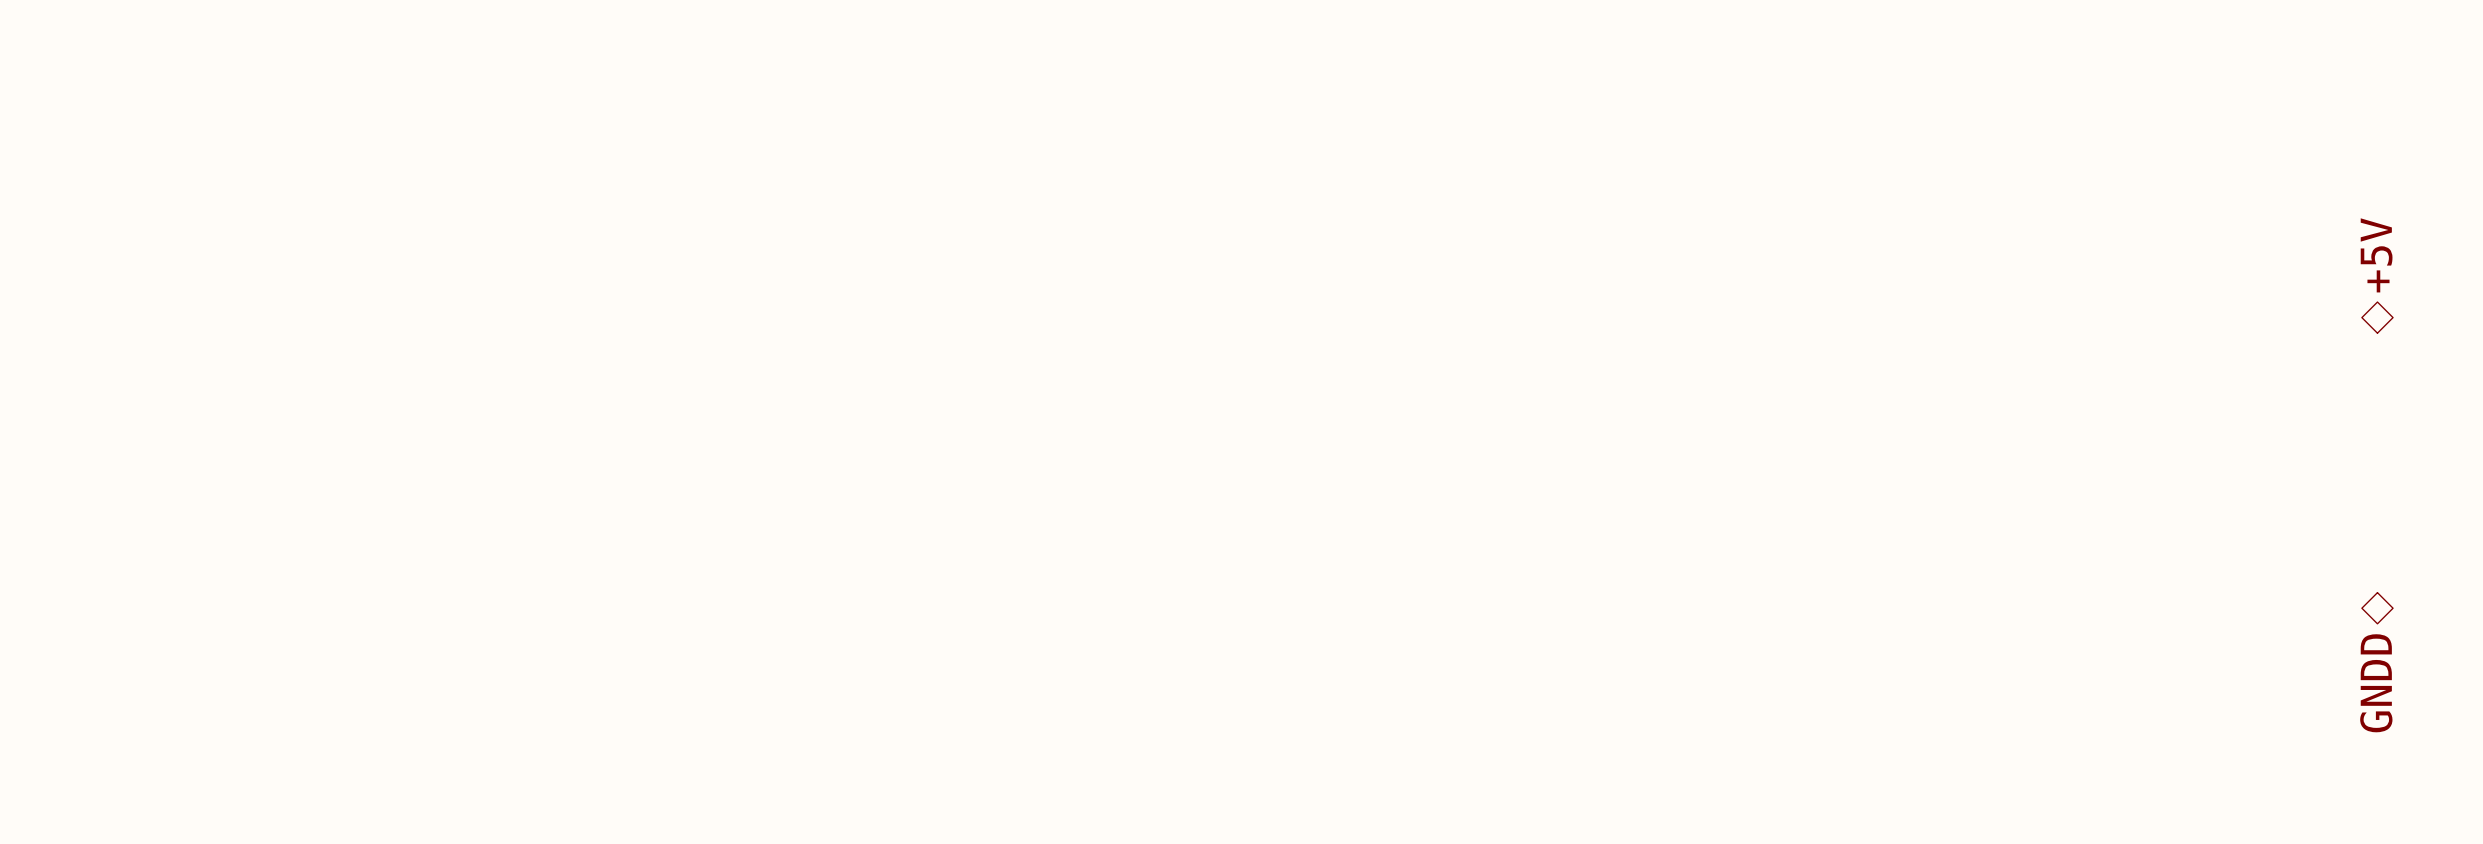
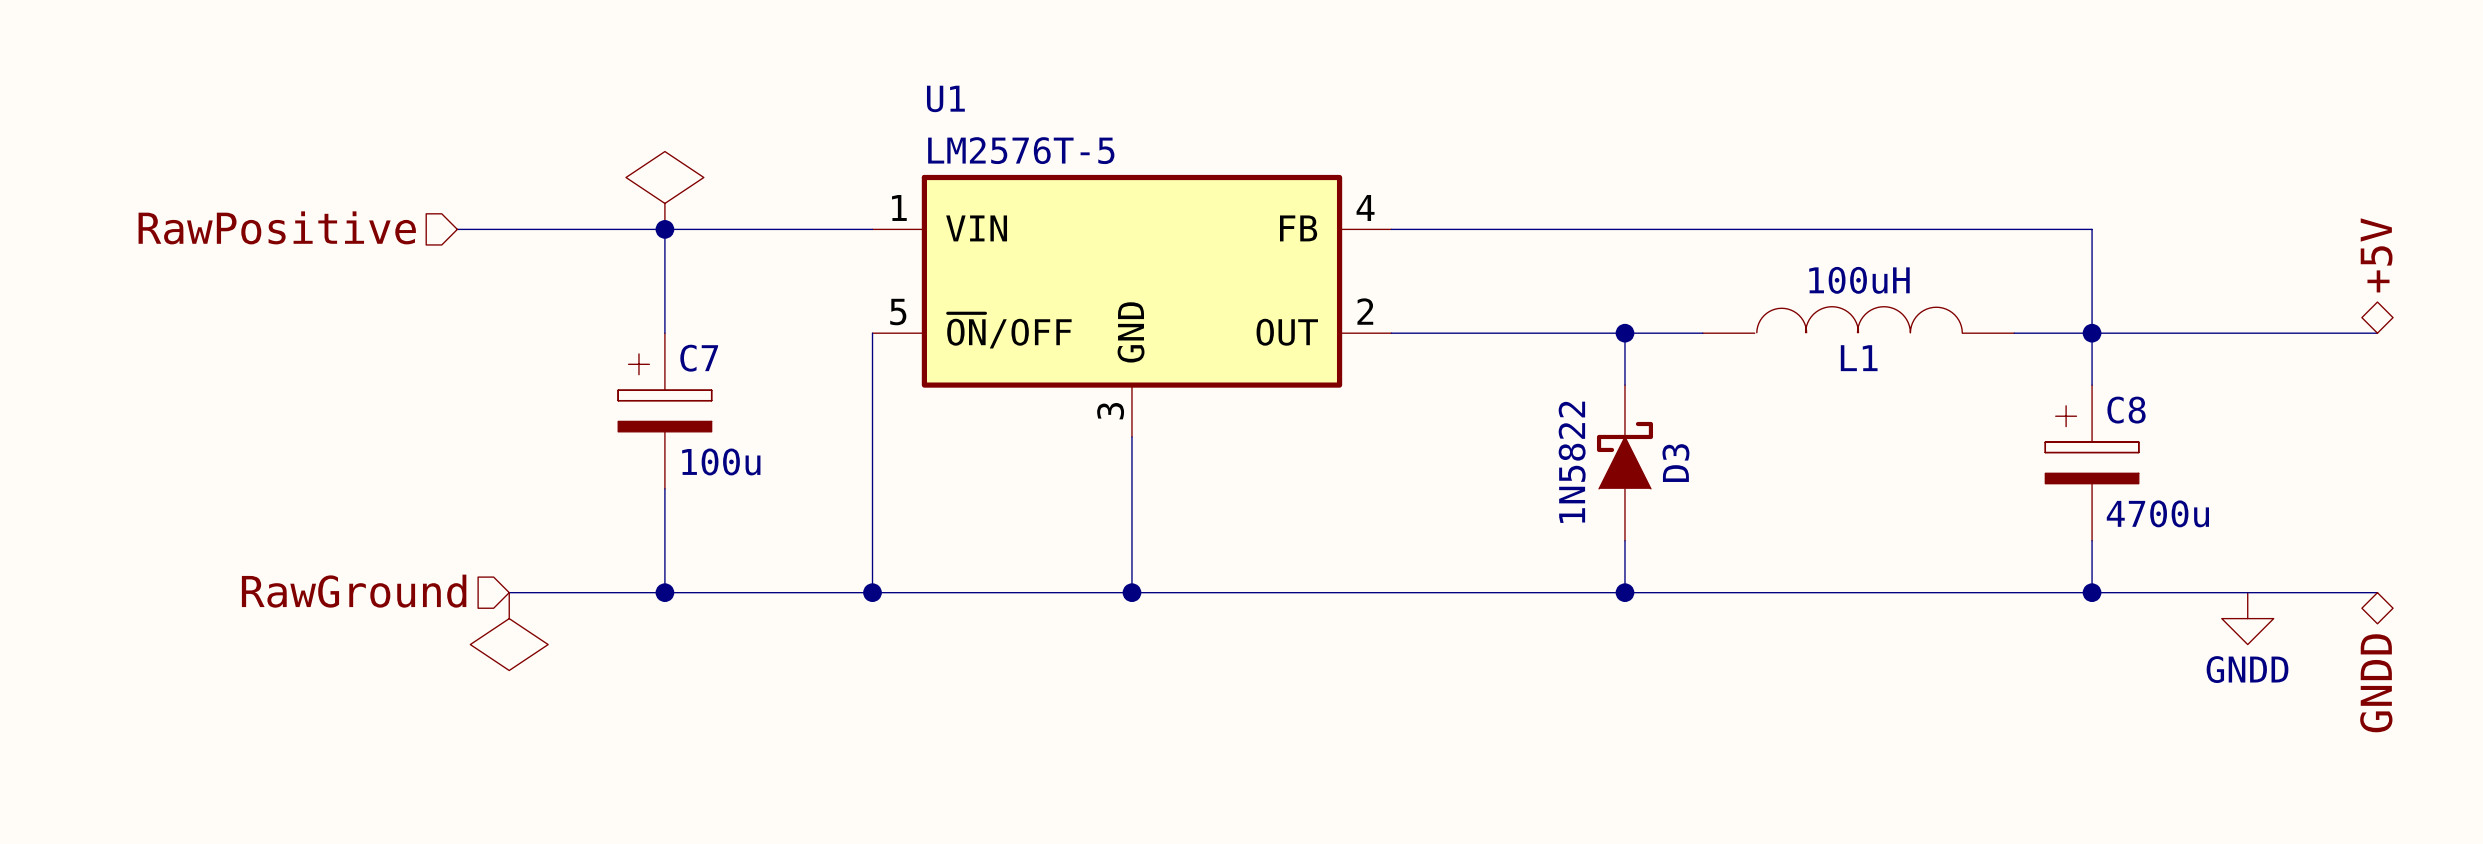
power symbol: none -> (664, 190)
hierarchical label: none -> RawPositive (277, 227)
wire: none -> (457, 229) (872, 229)
wire: none -> (664, 229) (664, 333)
junction: none -> (664, 229)
wire: none -> (1391, 229) (2092, 229) (2092, 385)
U1: none -> LM2576T-5 (1131, 305)
L1: none -> 100uH (1858, 319)
wire: none -> (872, 333) (872, 592)
wire: none -> (1391, 333) (1702, 333)
wire: none -> (1624, 333) (1624, 385)
junction: none -> (1624, 333)
wire: none -> (2014, 333) (2377, 333)
junction: none -> (2092, 333)
C7: none -> 100u (664, 411)
wire: none -> (1131, 436) (1131, 592)
D3: none -> 1N5822 (1624, 462)
C8: none -> 4700u (2092, 462)
wire: none -> (664, 488) (664, 592)
wire: none -> (1624, 540) (1624, 592)
wire: none -> (2092, 540) (2092, 592)
hierarchical label: none -> RawGround (354, 591)
wire: none -> (509, 592) (2377, 592)
junction: none -> (664, 592)
junction: none -> (872, 592)
junction: none -> (1131, 592)
junction: none -> (1624, 592)
junction: none -> (2092, 592)
power symbol: none -> GNDD (2247, 618)
power symbol: none -> (509, 631)

